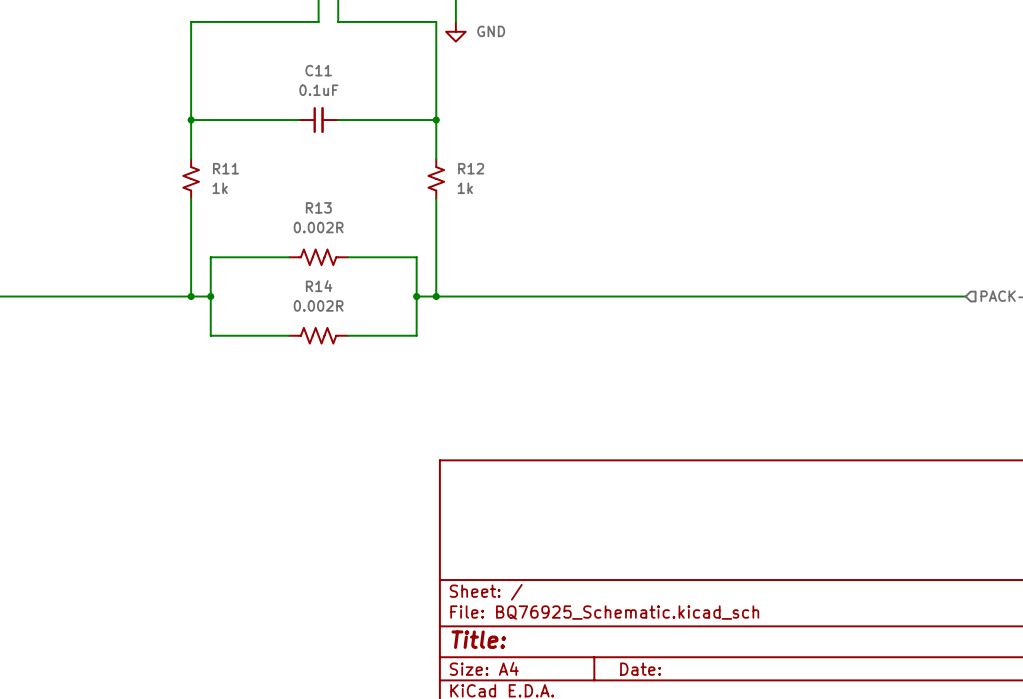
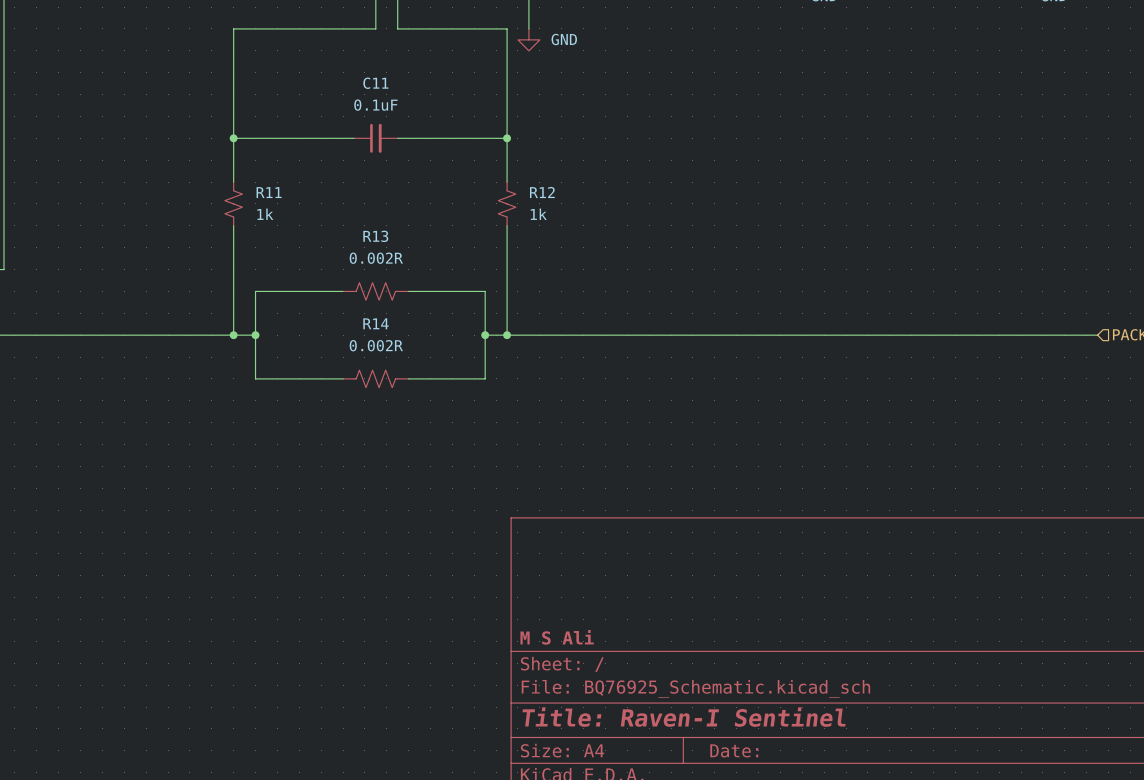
title block: none -> M S Ali (557, 637)
title block: Title: (478, 639) -> Title: Raven-I Sentinel (684, 717)

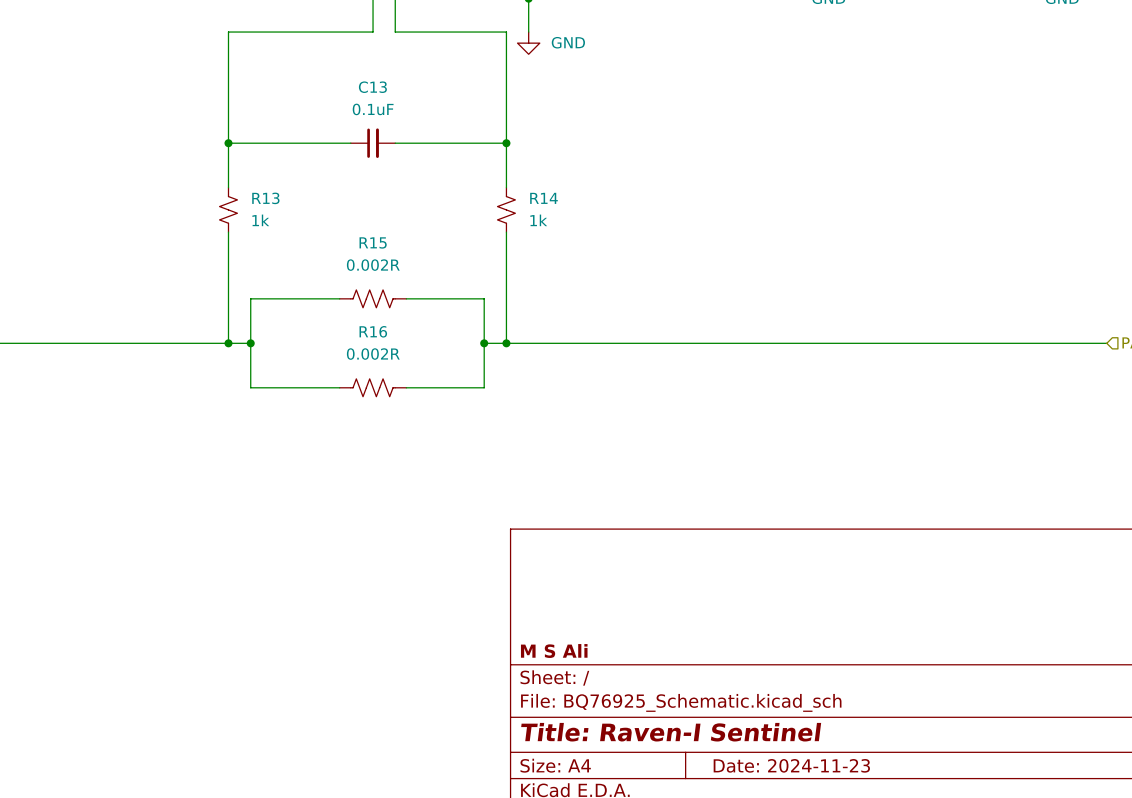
C11 name: C11 (375, 83) -> C13 (372, 87)
R11 name: R11 (269, 192) -> R13 (265, 198)
R12 name: R12 (542, 192) -> R14 (543, 198)
R13 name: R13 (375, 236) -> R15 (373, 242)
R14 name: R14 (375, 323) -> R16 (373, 331)
title block: Date: (734, 750) -> Date: 2024-11-23 (791, 765)

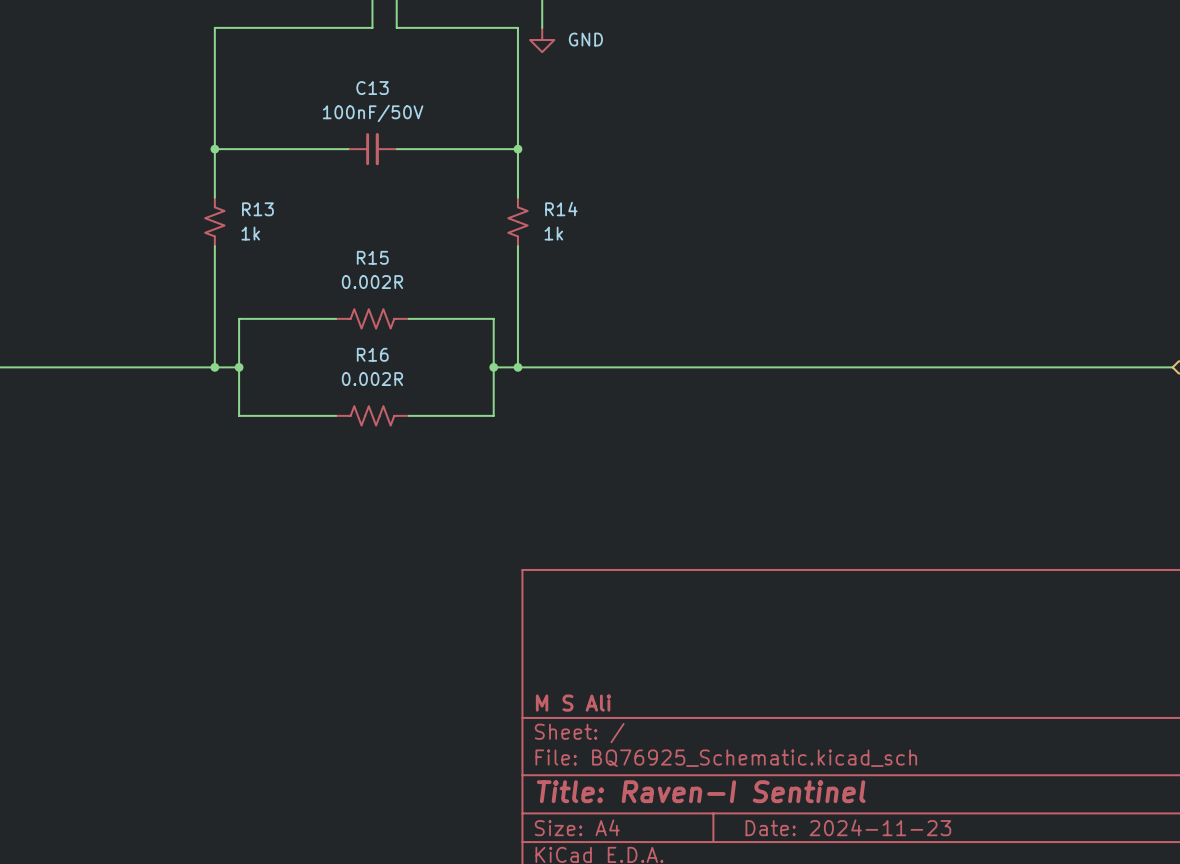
C13 value: 0.1uF (373, 109) -> 100nF/50V (373, 113)

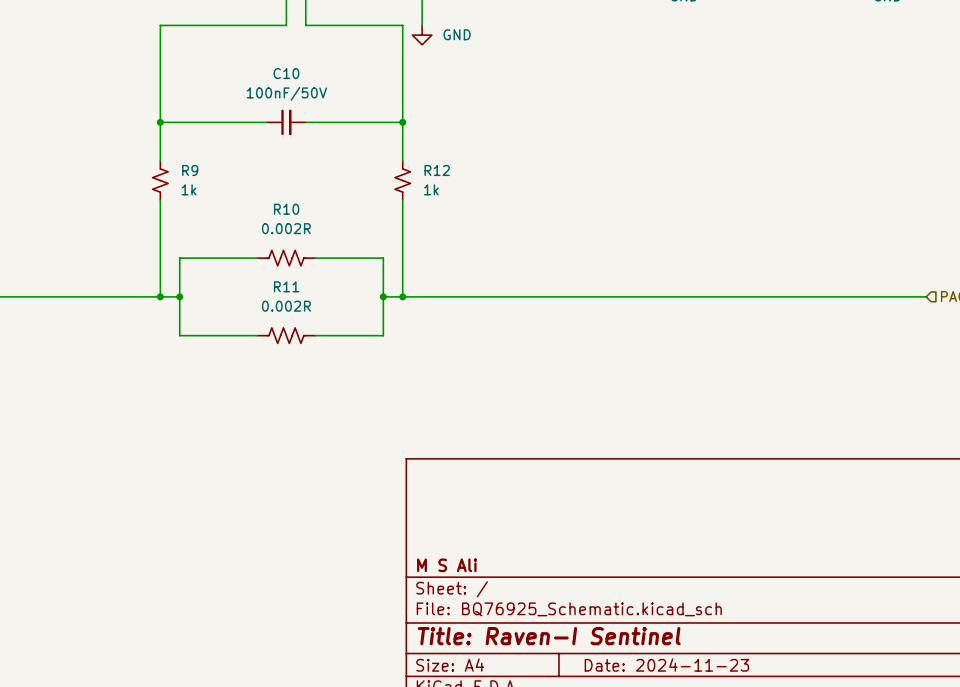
C13 name: C13 (372, 88) -> C10 (286, 73)
R13 name: R13 (257, 209) -> R9 (190, 170)
R14 name: R14 (561, 209) -> R12 (437, 170)
R15 name: R15 (372, 257) -> R10 (286, 209)
R16 name: R16 (372, 354) -> R11 (286, 286)

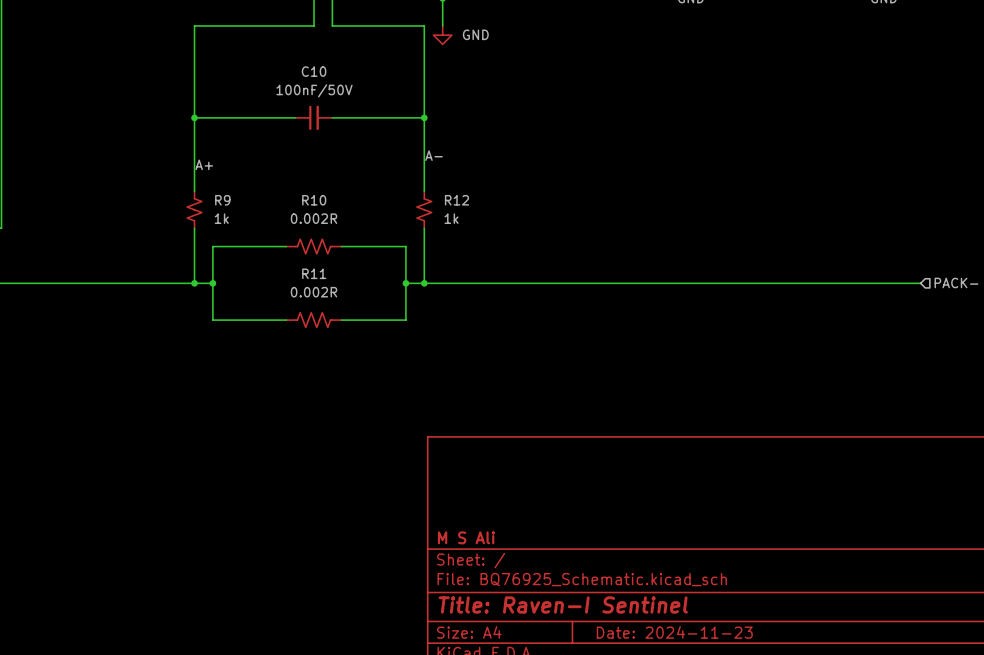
label: none -> A- (434, 155)
label: none -> A+ (204, 164)
R9 position: (160, 180) -> (194, 209)
R12 position: (402, 180) -> (424, 209)

